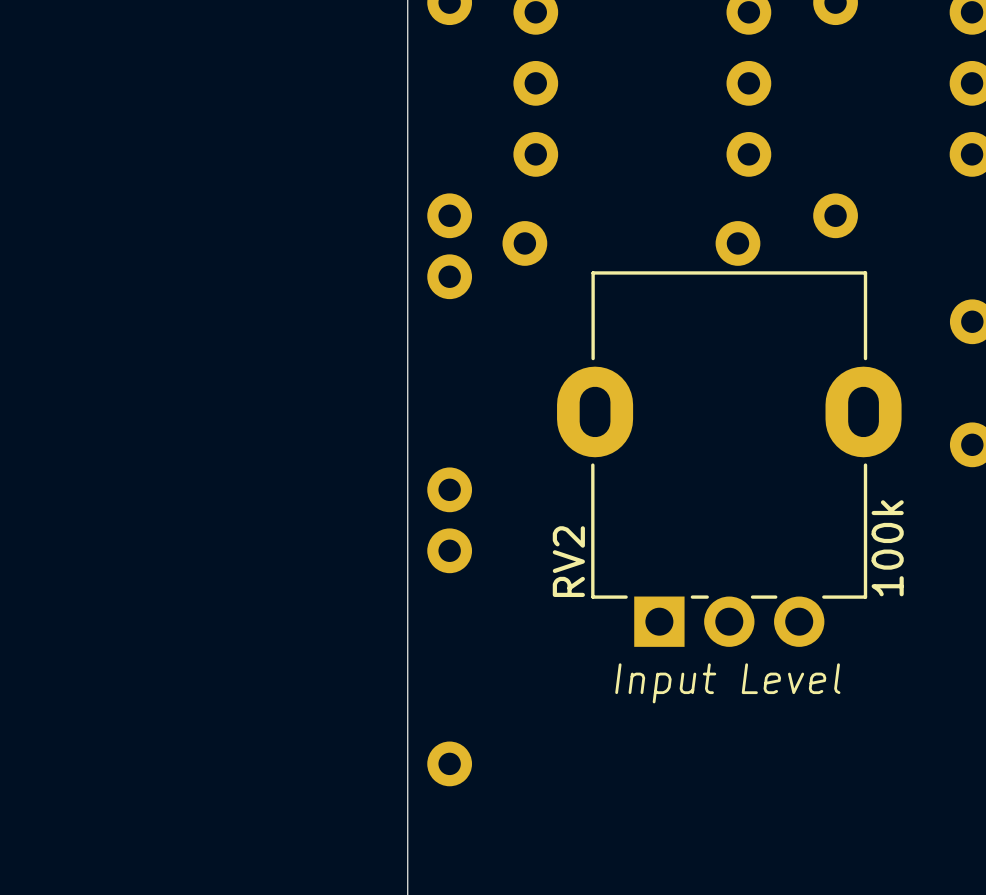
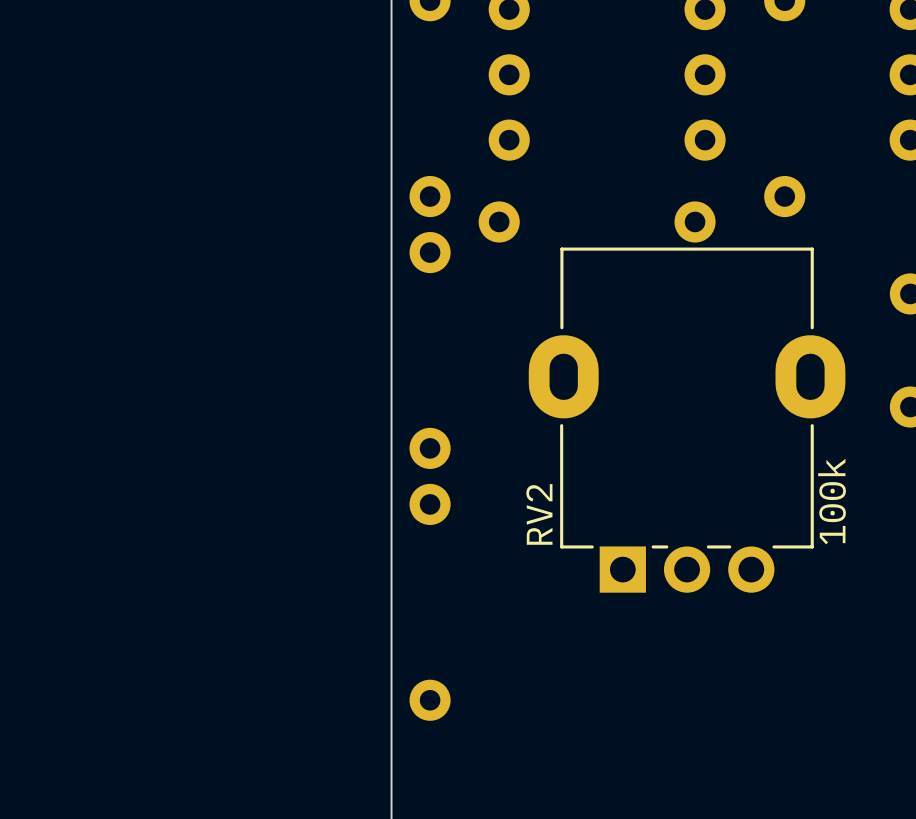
RV2 text: Input Level (727, 683) -> none

